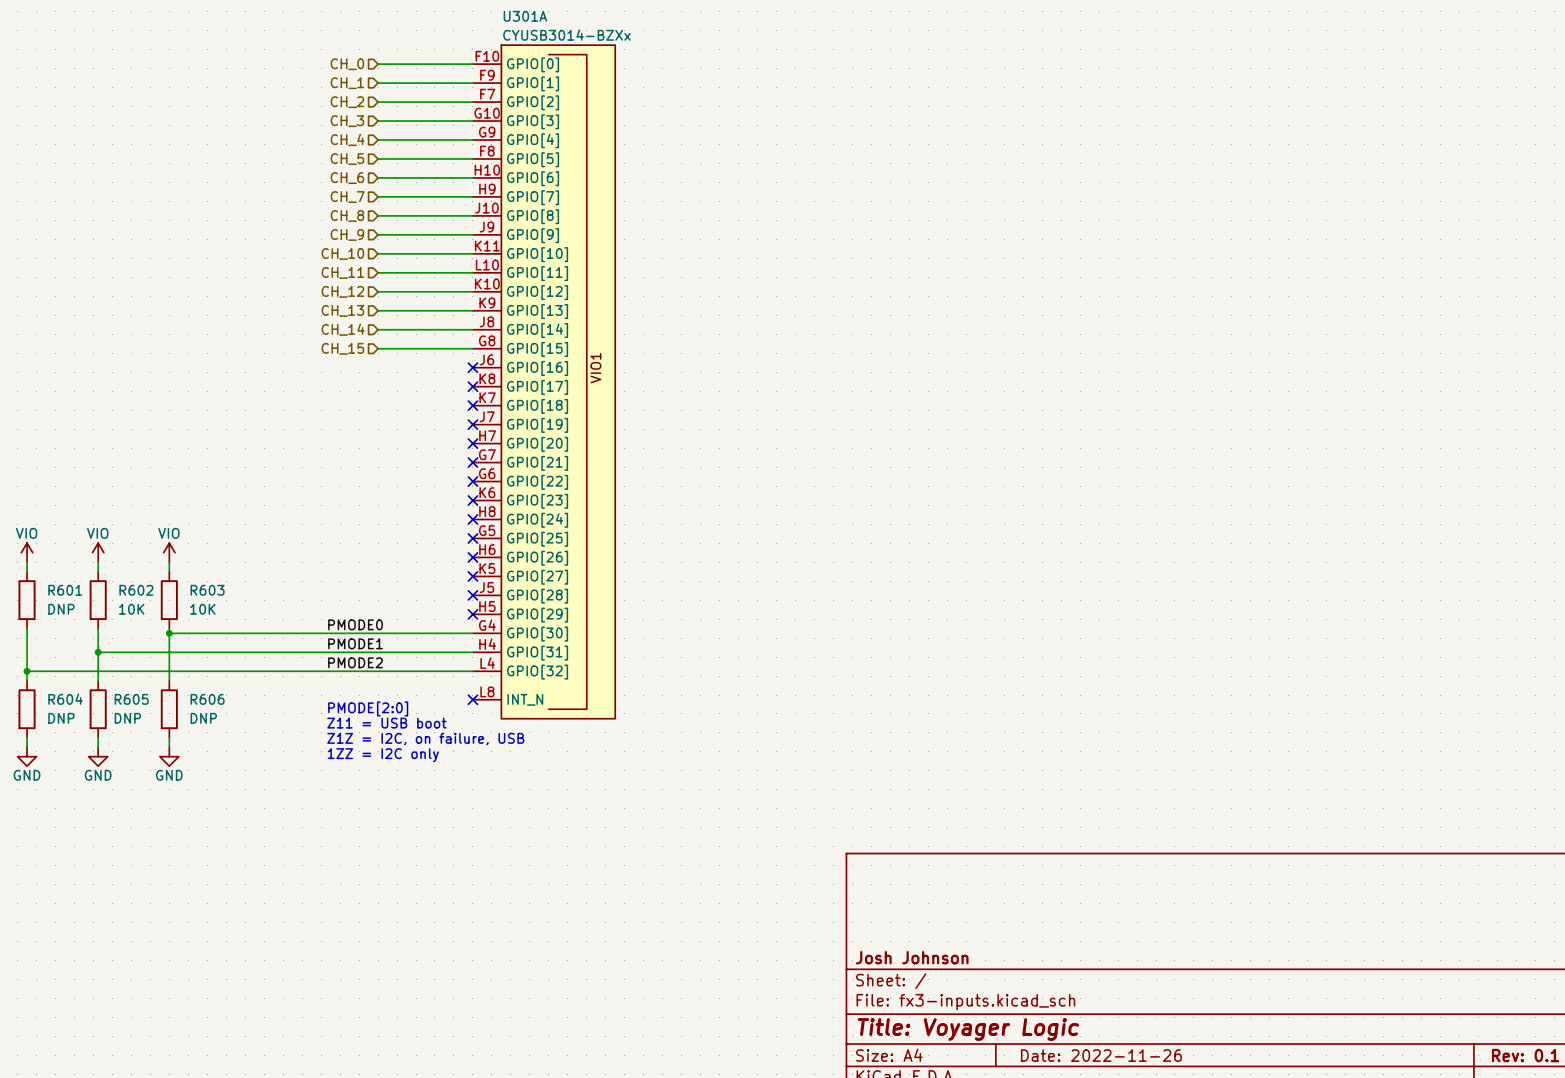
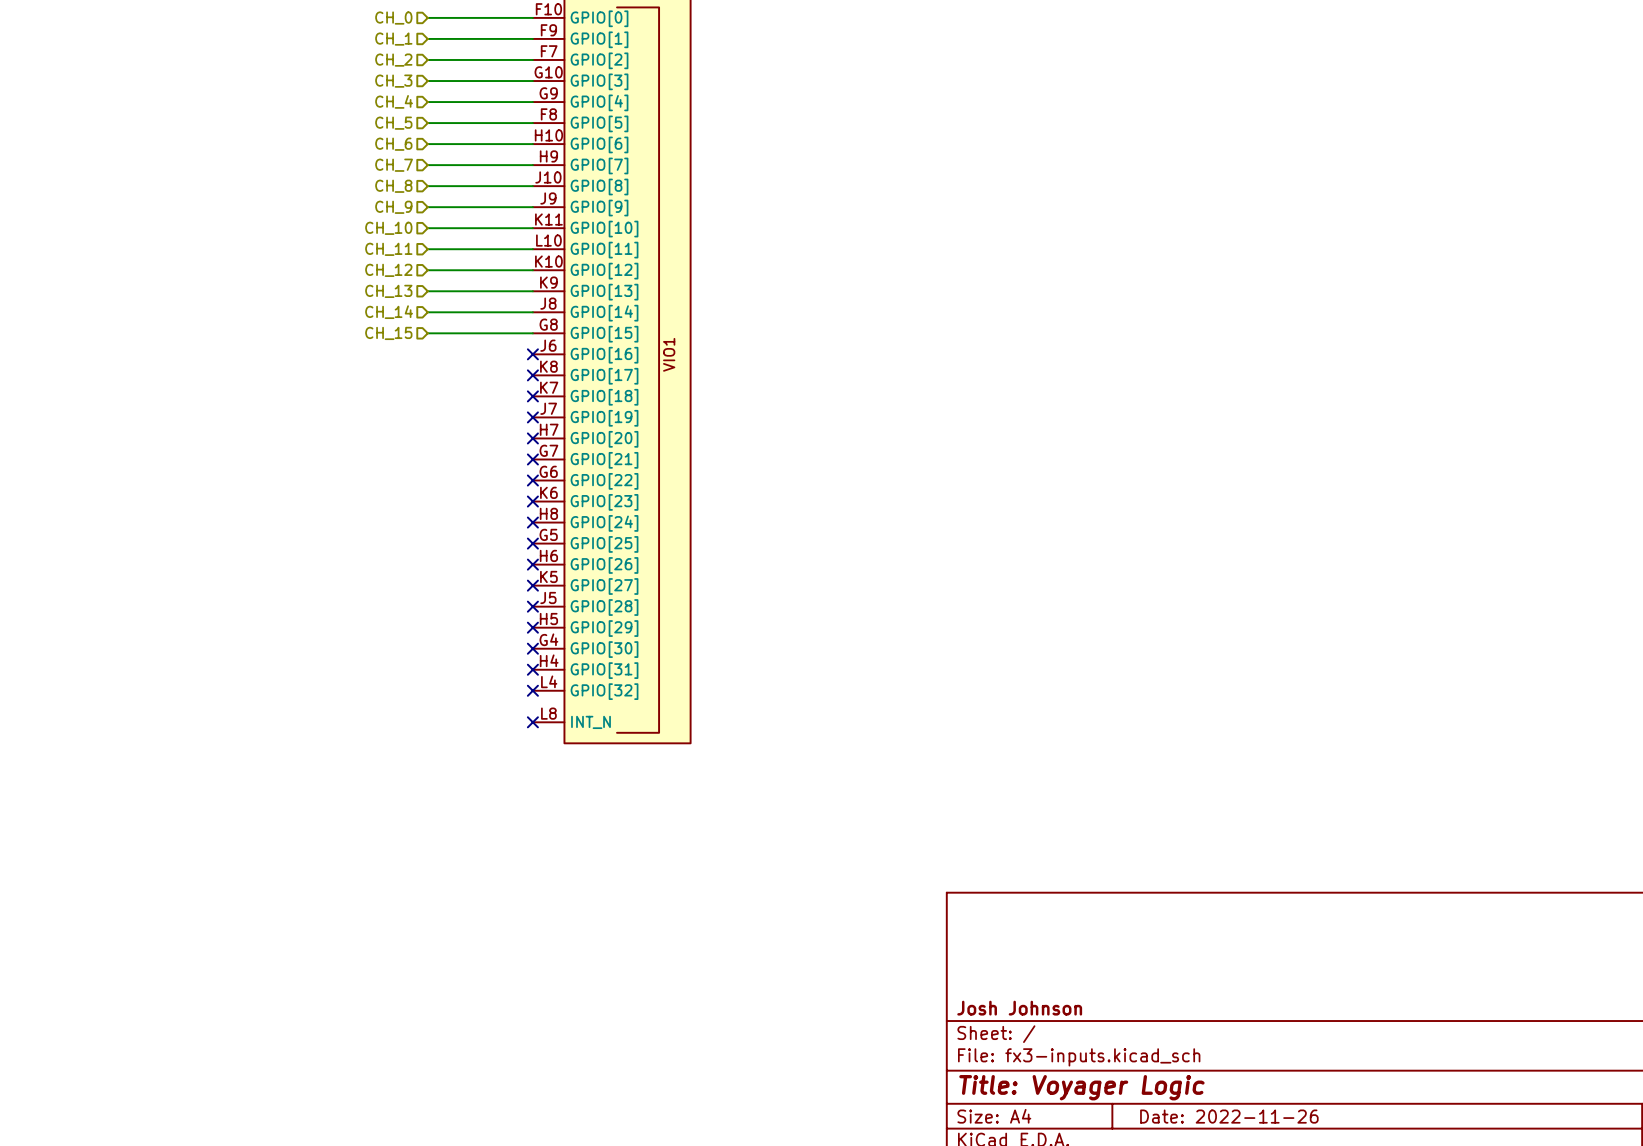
power symbol: VIO (27, 552) -> none
power symbol: VIO (98, 552) -> none
power symbol: VIO (169, 552) -> none
wire: (27, 562) (27, 571) -> none
wire: (98, 562) (98, 571) -> none
wire: (169, 562) (169, 571) -> none
R601: DNP (27, 600) -> none
R602: 10K (98, 600) -> none
R603: 10K (169, 600) -> none
label: PMODE0 (355, 624) -> none
wire: (27, 628) (27, 680) -> none
wire: (98, 628) (98, 680) -> none
wire: (169, 628) (169, 680) -> none
wire: (169, 633) (472, 633) -> none
junction: (169, 633) -> none
no-connect mark: none -> (532, 648)
label: PMODE1 (355, 643) -> none
wire: (98, 652) (472, 652) -> none
junction: (98, 652) -> none
no-connect mark: none -> (532, 669)
label: PMODE2 (355, 662) -> none
wire: (27, 671) (472, 671) -> none
junction: (27, 671) -> none
no-connect mark: none -> (532, 690)
text: PMODE[2:0] (368, 708) -> none
R604: DNP (27, 709) -> none
R605: DNP (98, 709) -> none
R606: DNP (169, 709) -> none
text: Z11 = USB boot (386, 723) -> none
wire: (27, 737) (27, 747) -> none
wire: (98, 737) (98, 747) -> none
wire: (169, 737) (169, 747) -> none
text: Z1Z = I2C, on failure, USB (425, 739) -> none
text: 1ZZ = I2C only (383, 755) -> none
power symbol: GND (27, 756) -> none
power symbol: GND (98, 756) -> none
power symbol: GND (169, 756) -> none

